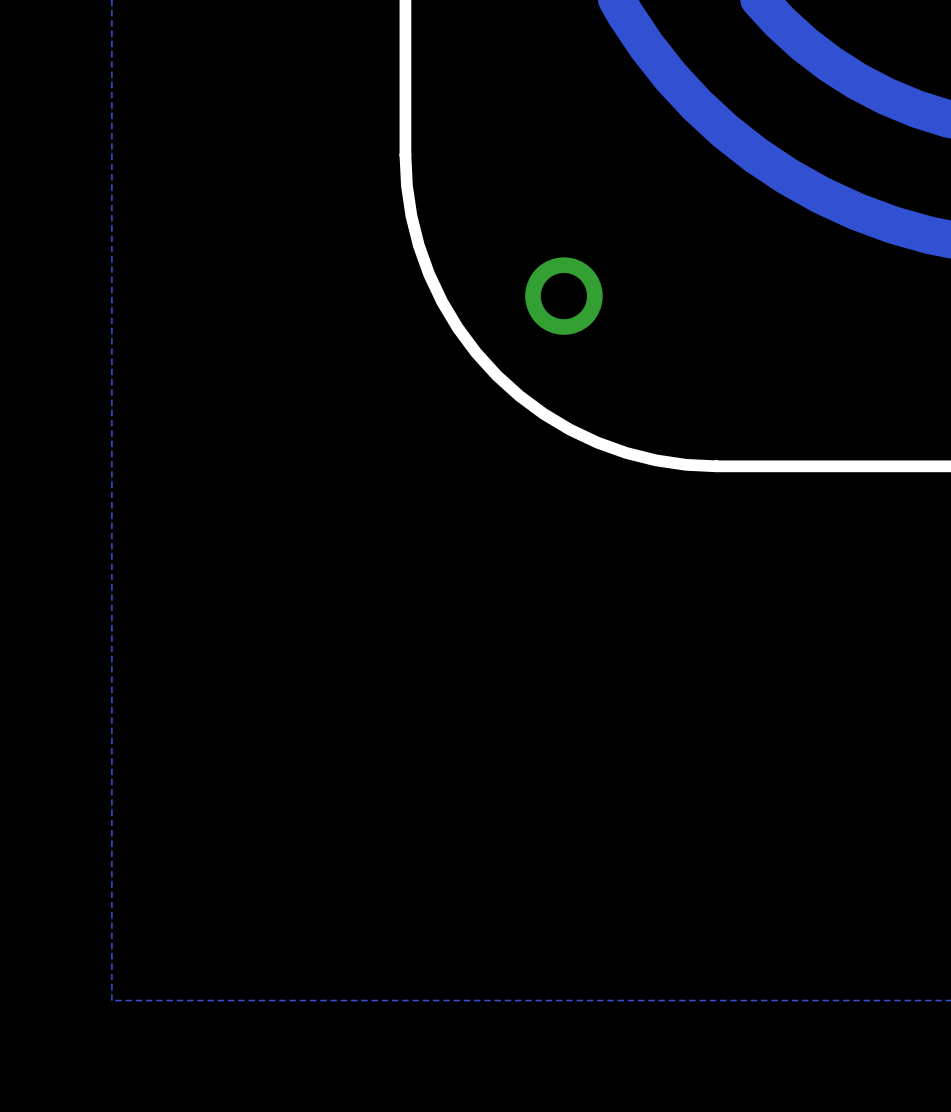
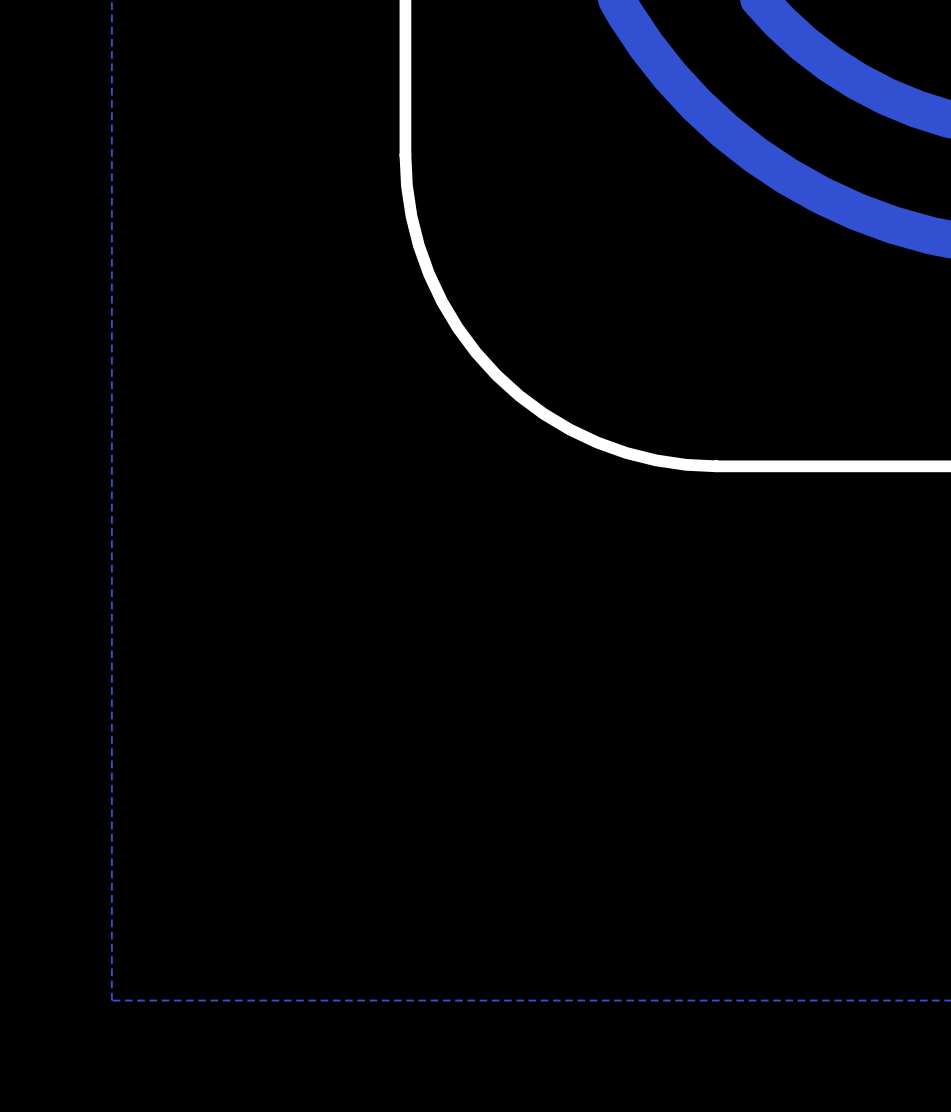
via: (563, 296) -> none

